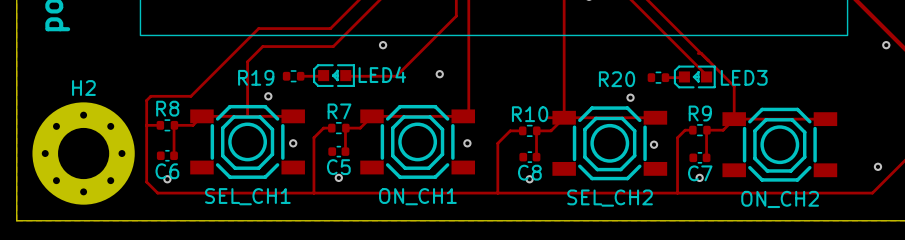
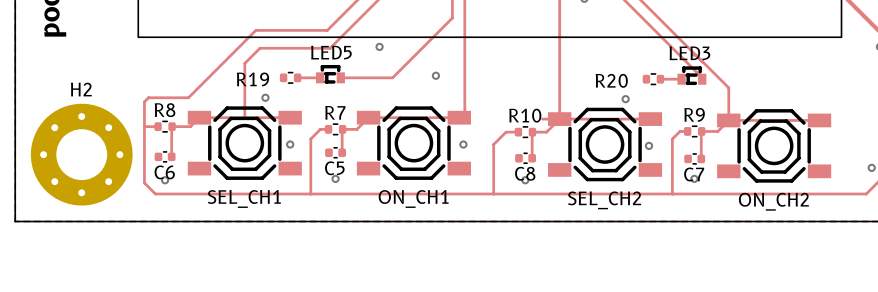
LED3 footprint: [673, 65, 716, 89] -> [677, 66, 707, 86]
LED5: none -> (330, 74)
LED4: (333, 75) -> none
LED3 name position: LED3 (744, 77) -> LED3 (689, 53)

